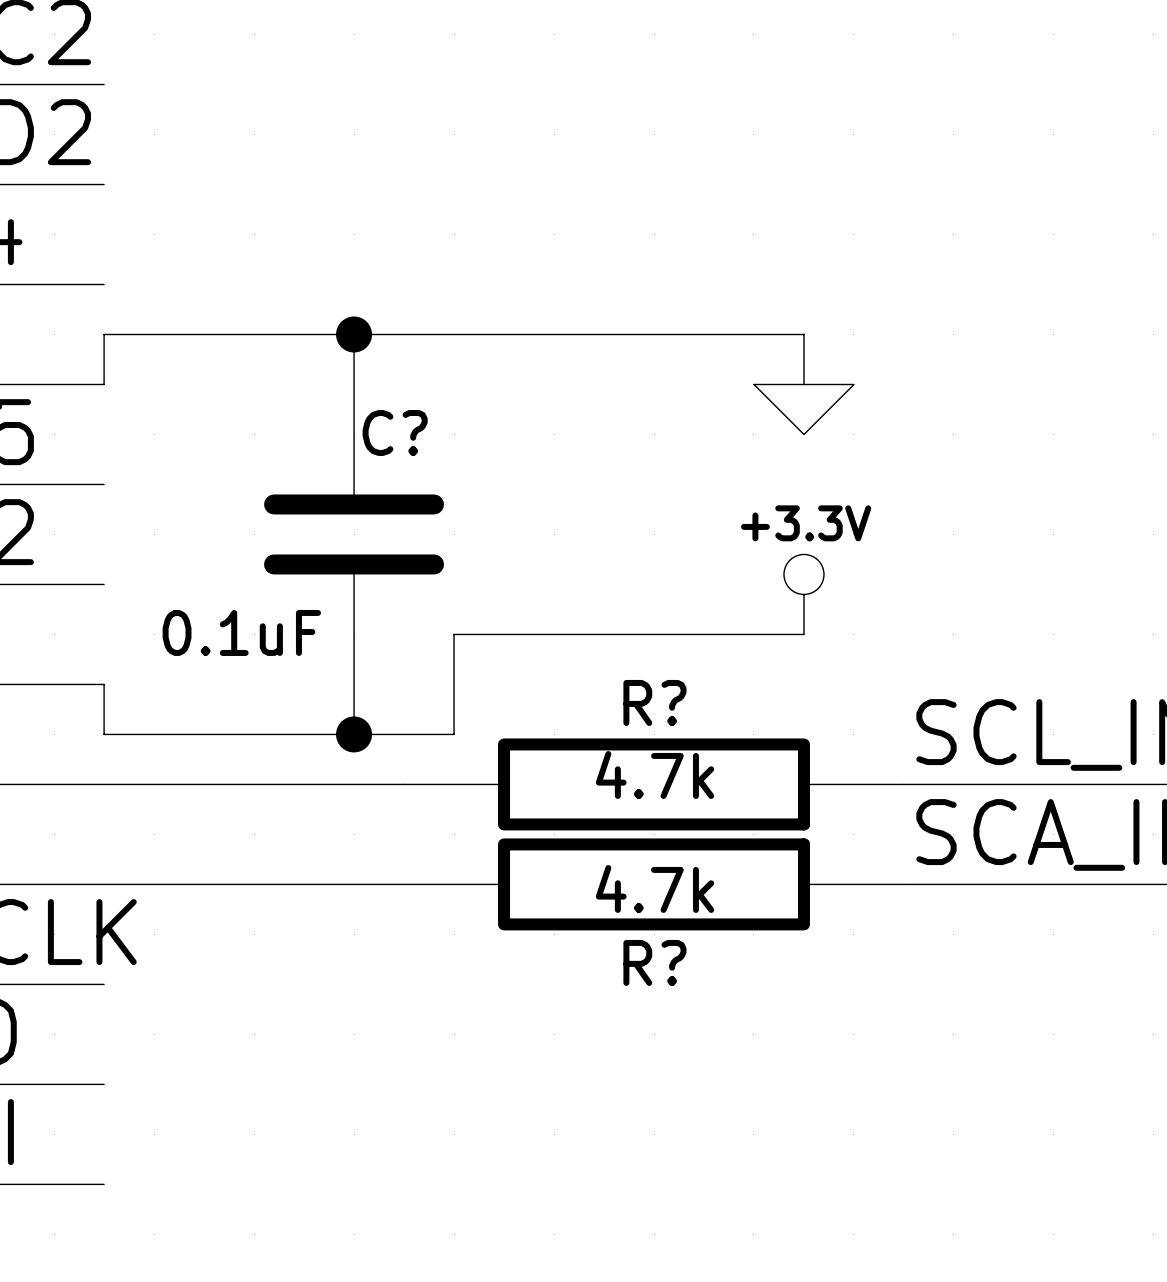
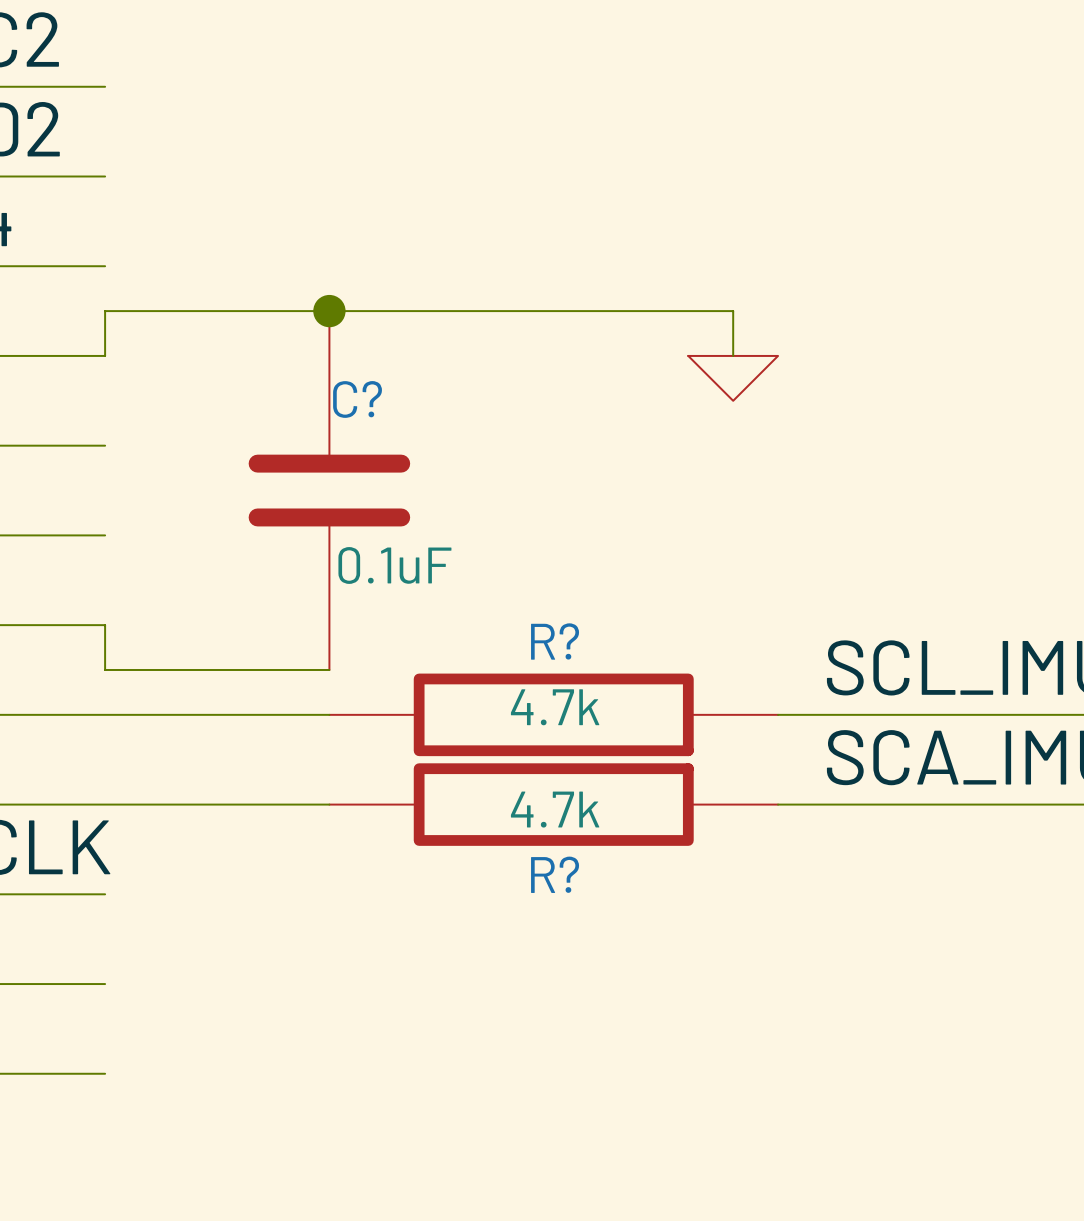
power symbol: +3.3V (803, 594) -> none
C? value position: 0.1uF (241, 632) -> 0.1uF (394, 565)
wire: (803, 634) (454, 634) (454, 734) (354, 734) -> none
junction: (354, 734) -> none
R? position: (654, 784) -> (553, 714)
R? position: (654, 884) -> (553, 804)

